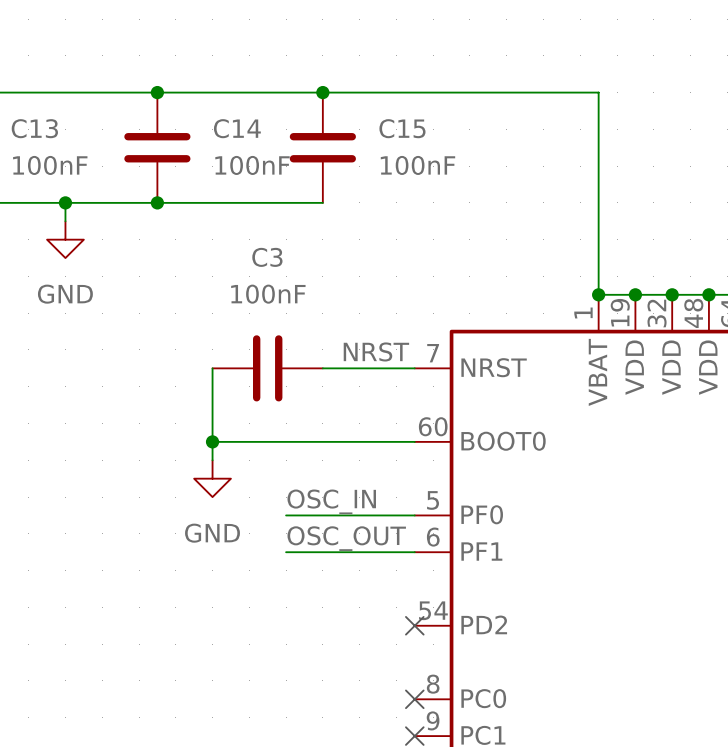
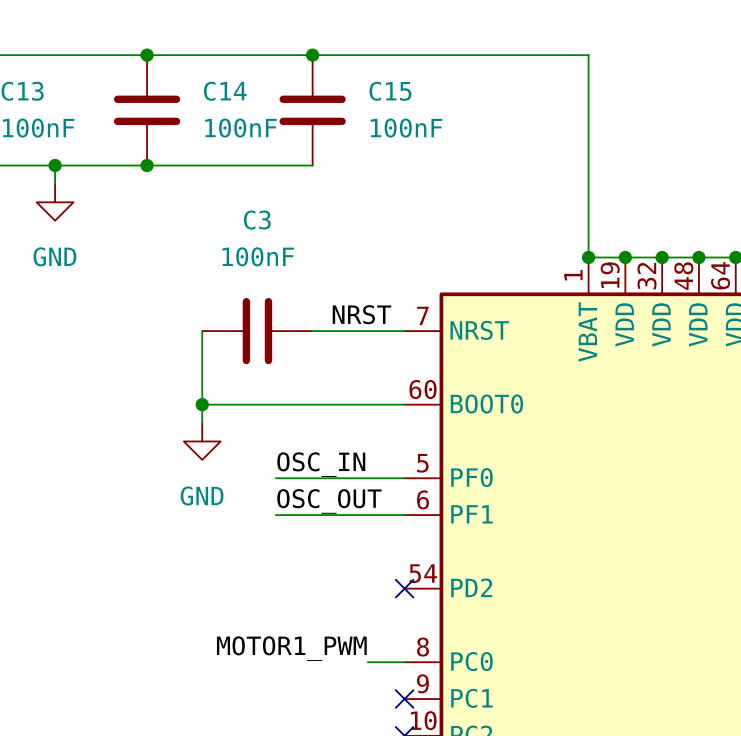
label: none -> MOTOR1_PWM (291, 648)
wire: none -> (367, 662) (404, 662)
no-connect mark: (414, 699) -> none

